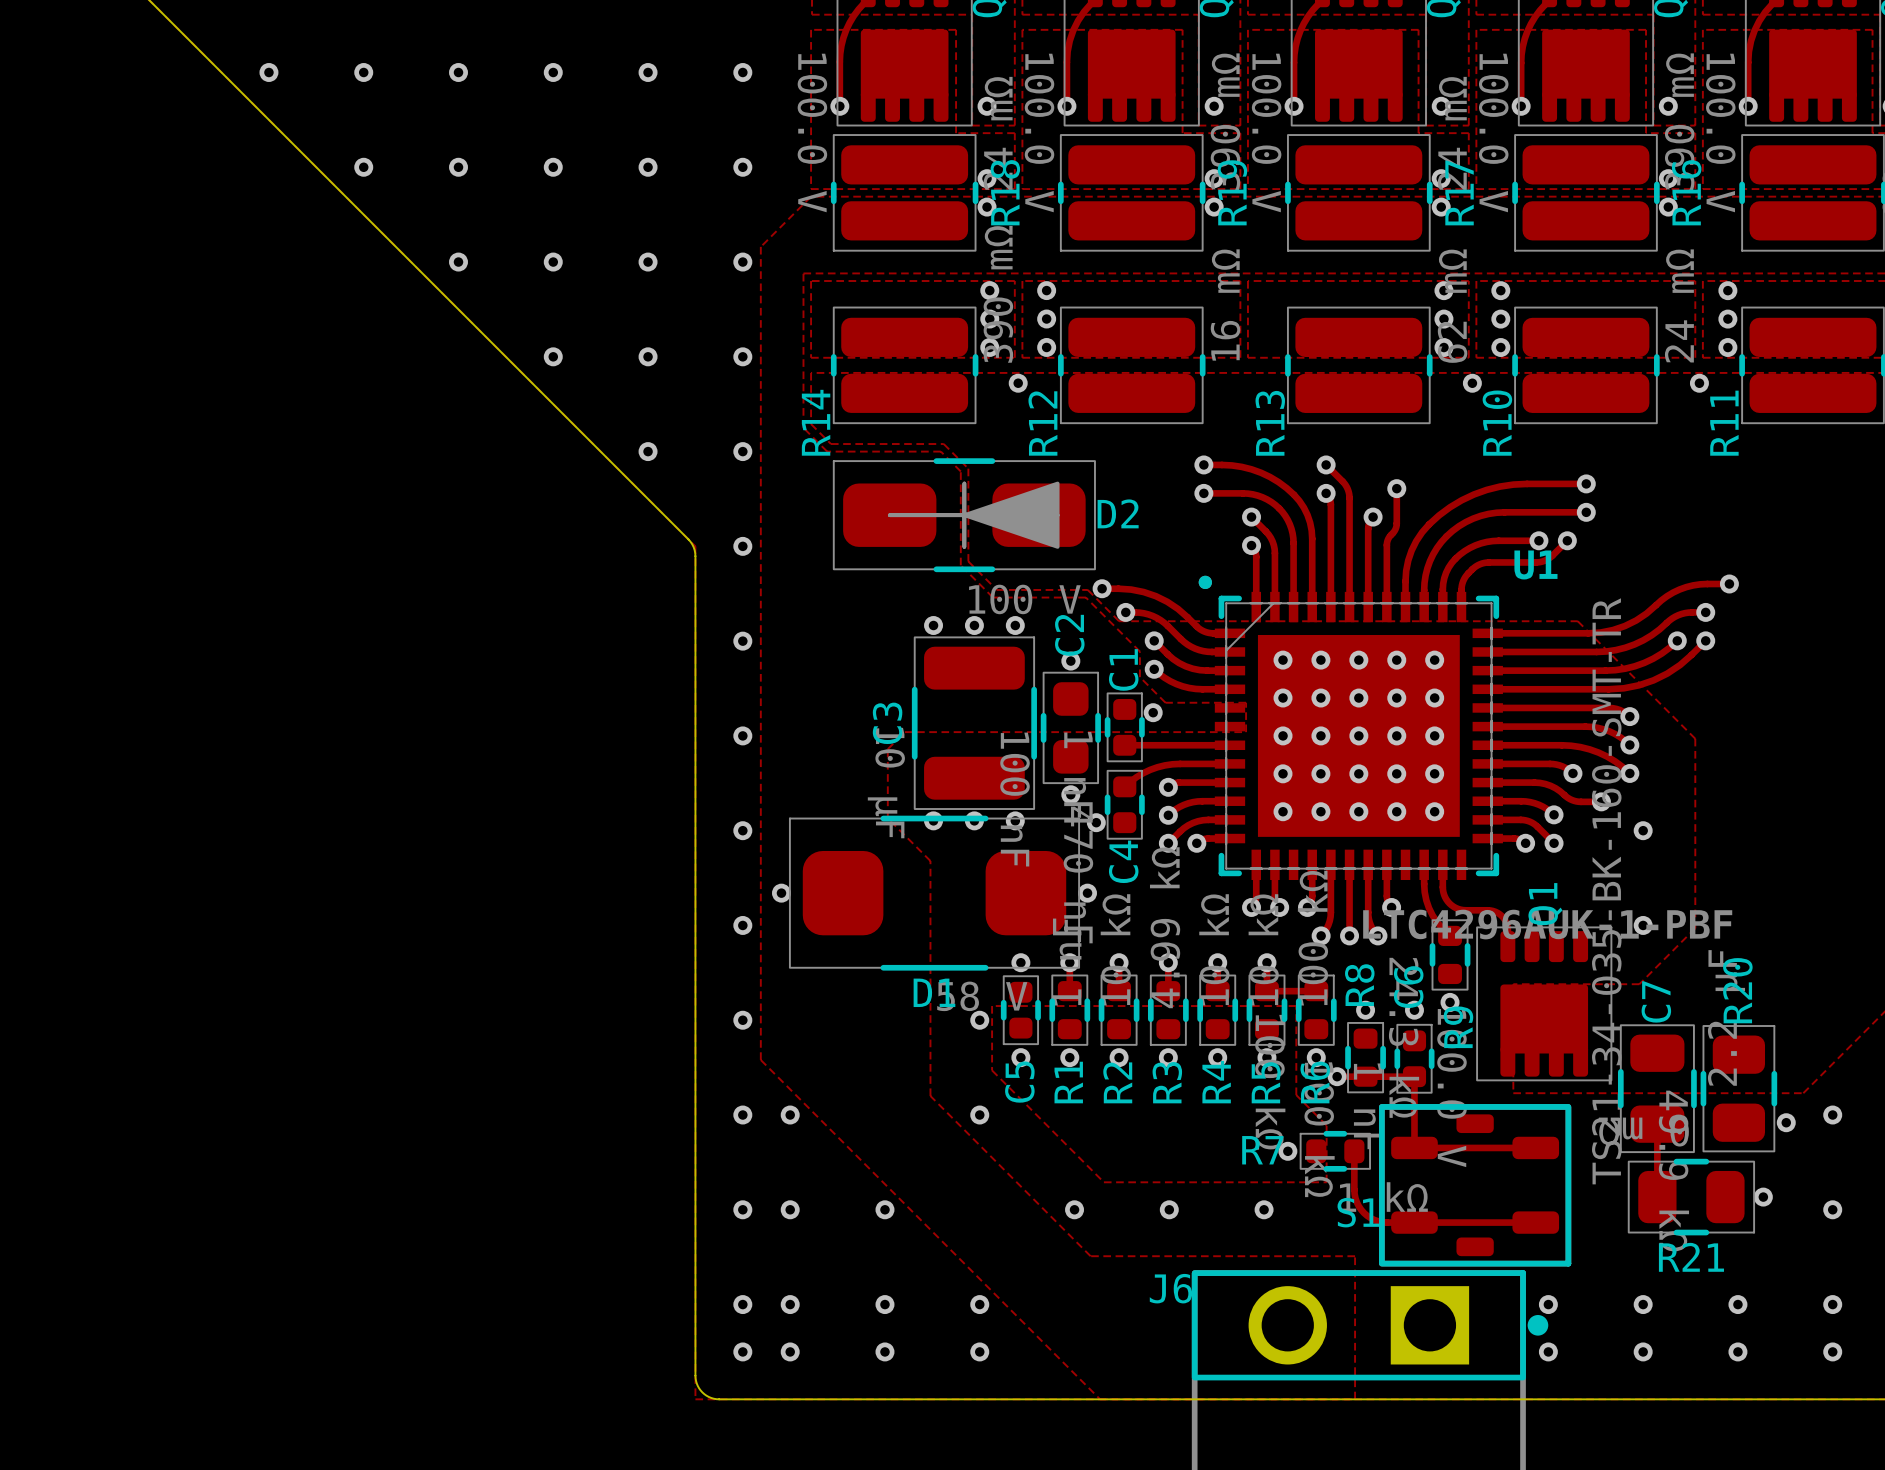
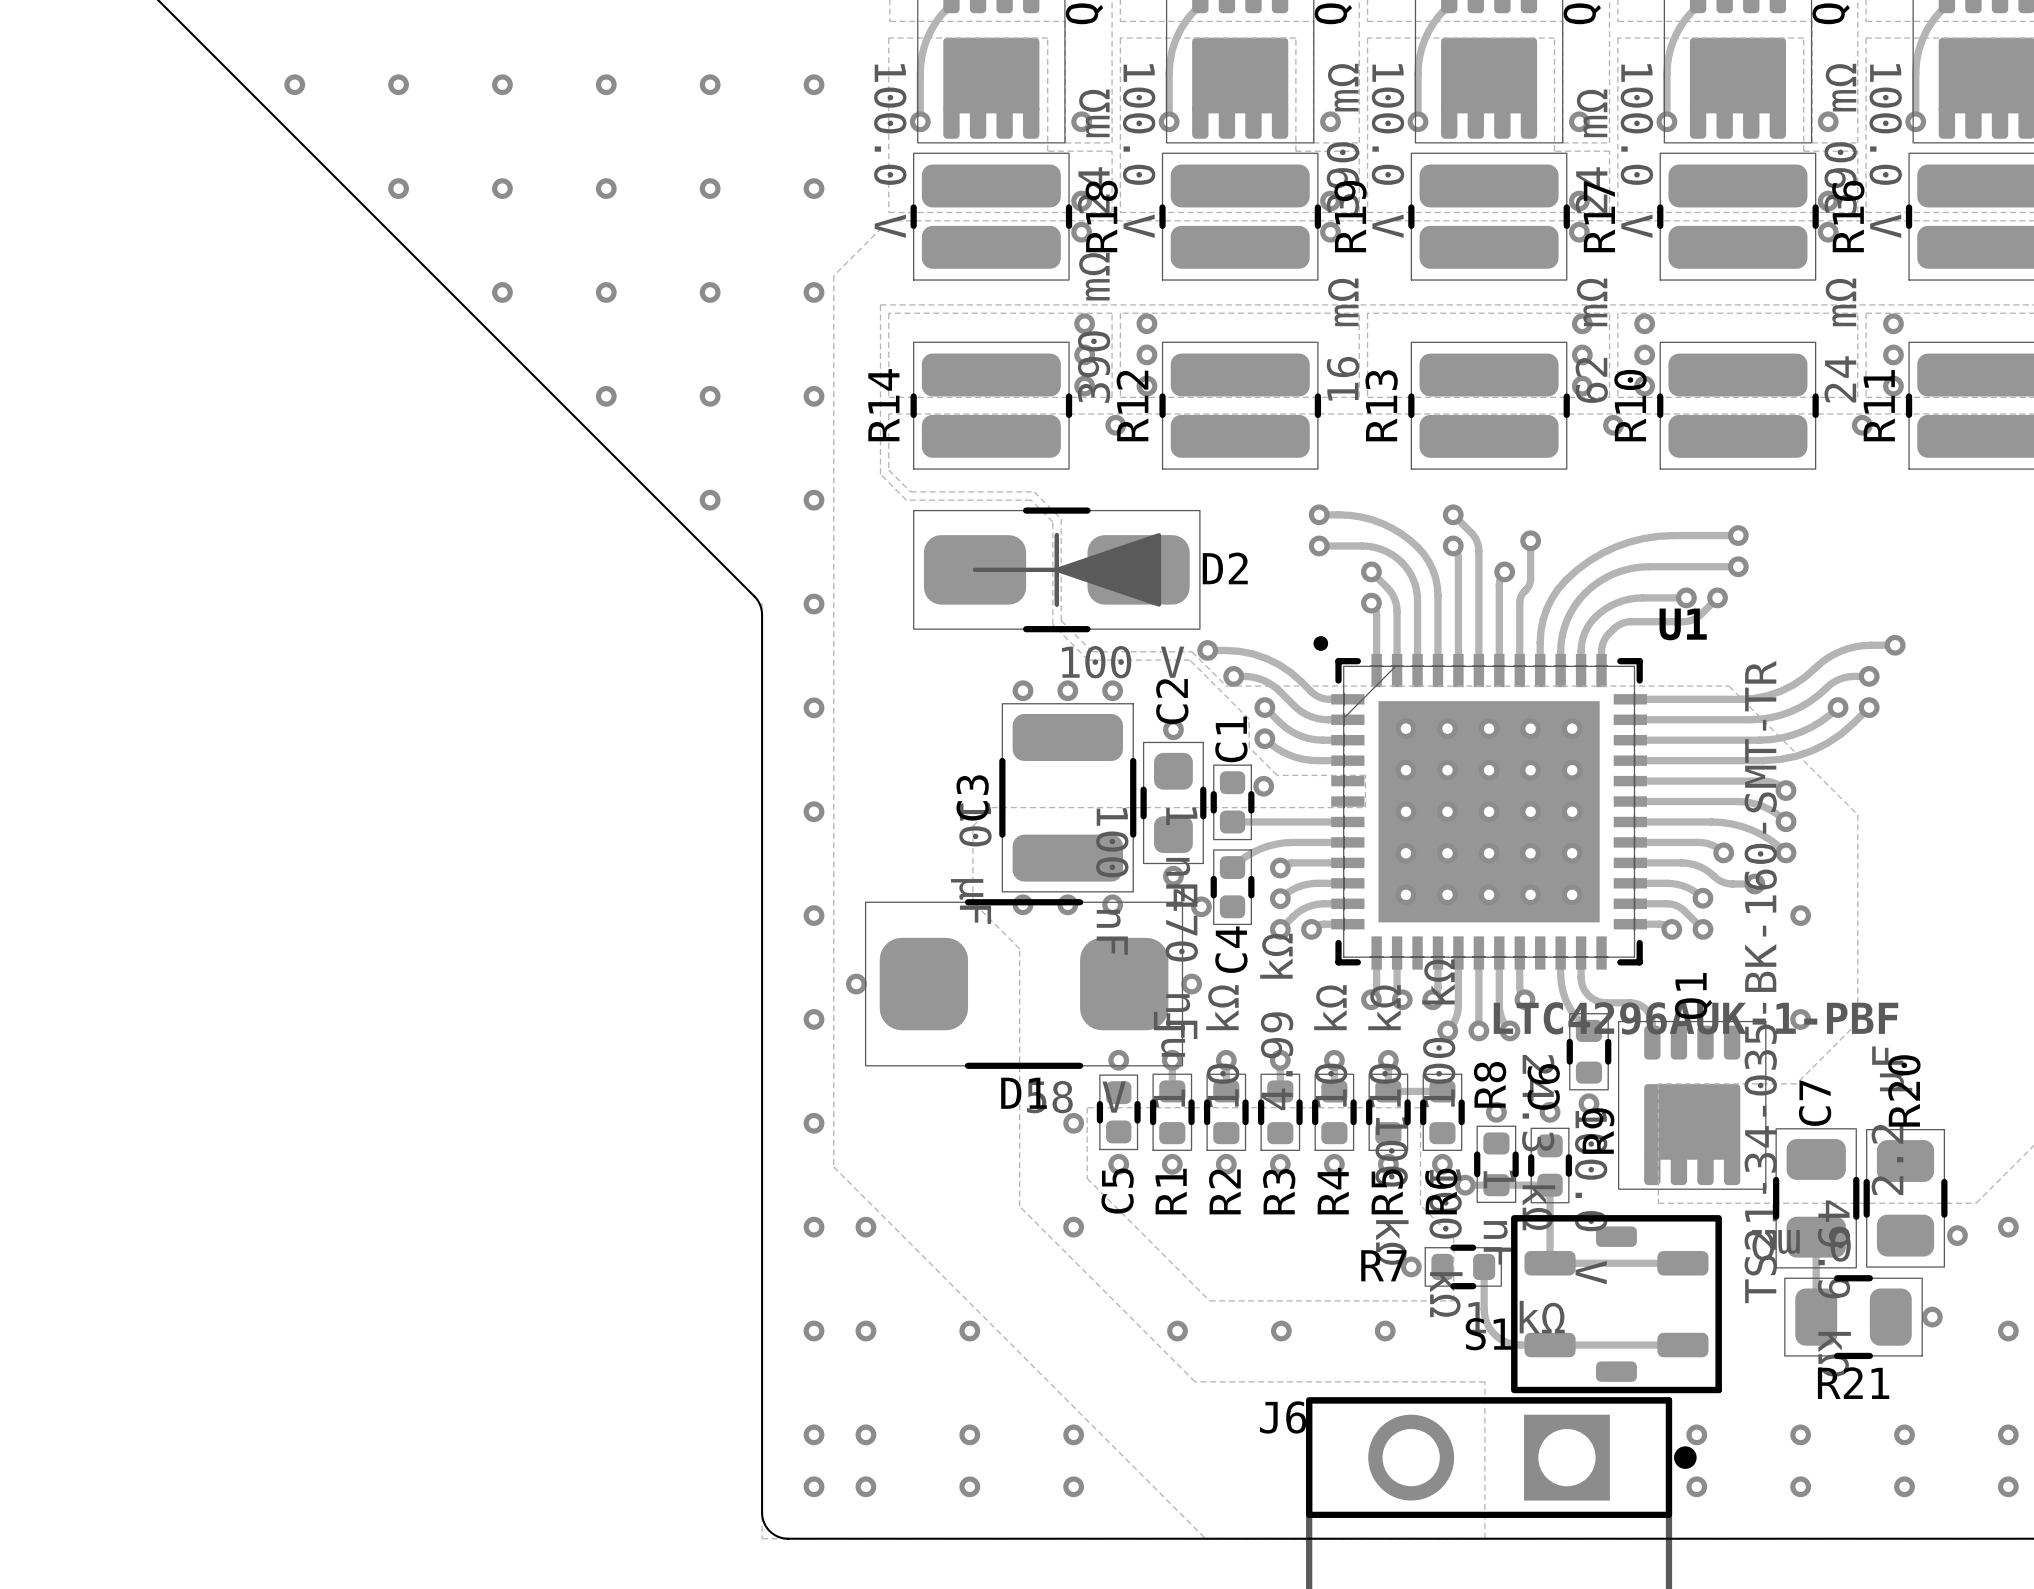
R14 name position: R14 (816, 422) -> R14 (883, 405)
R12 name position: R12 (1042, 423) -> R12 (1132, 405)
R13 name position: R13 (1270, 423) -> R13 (1381, 405)
R10 name position: R10 (1497, 423) -> R10 (1630, 405)
R11 name position: R11 (1724, 423) -> R11 (1879, 405)

